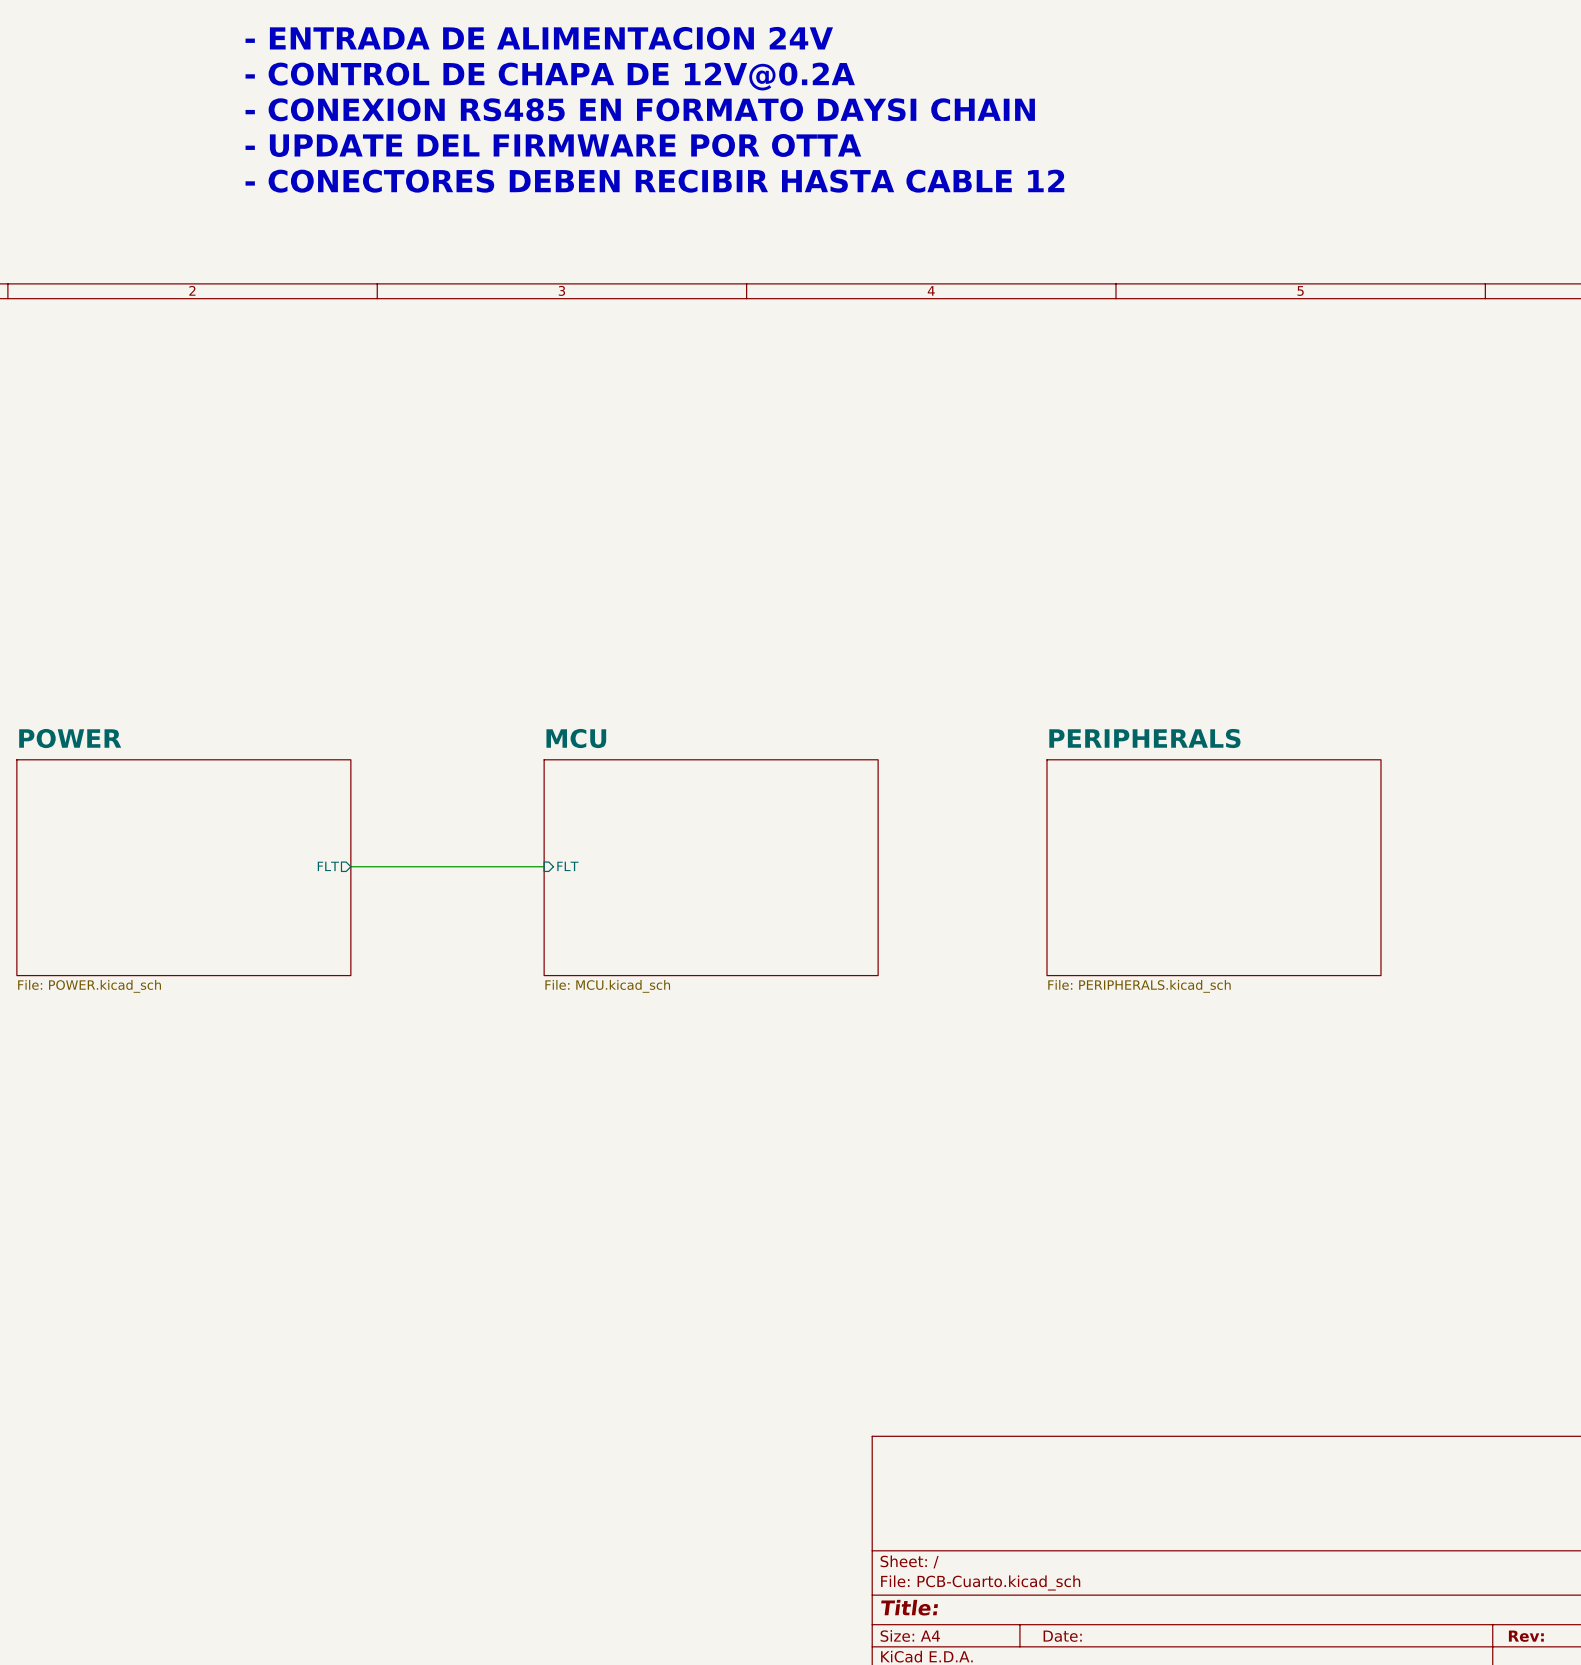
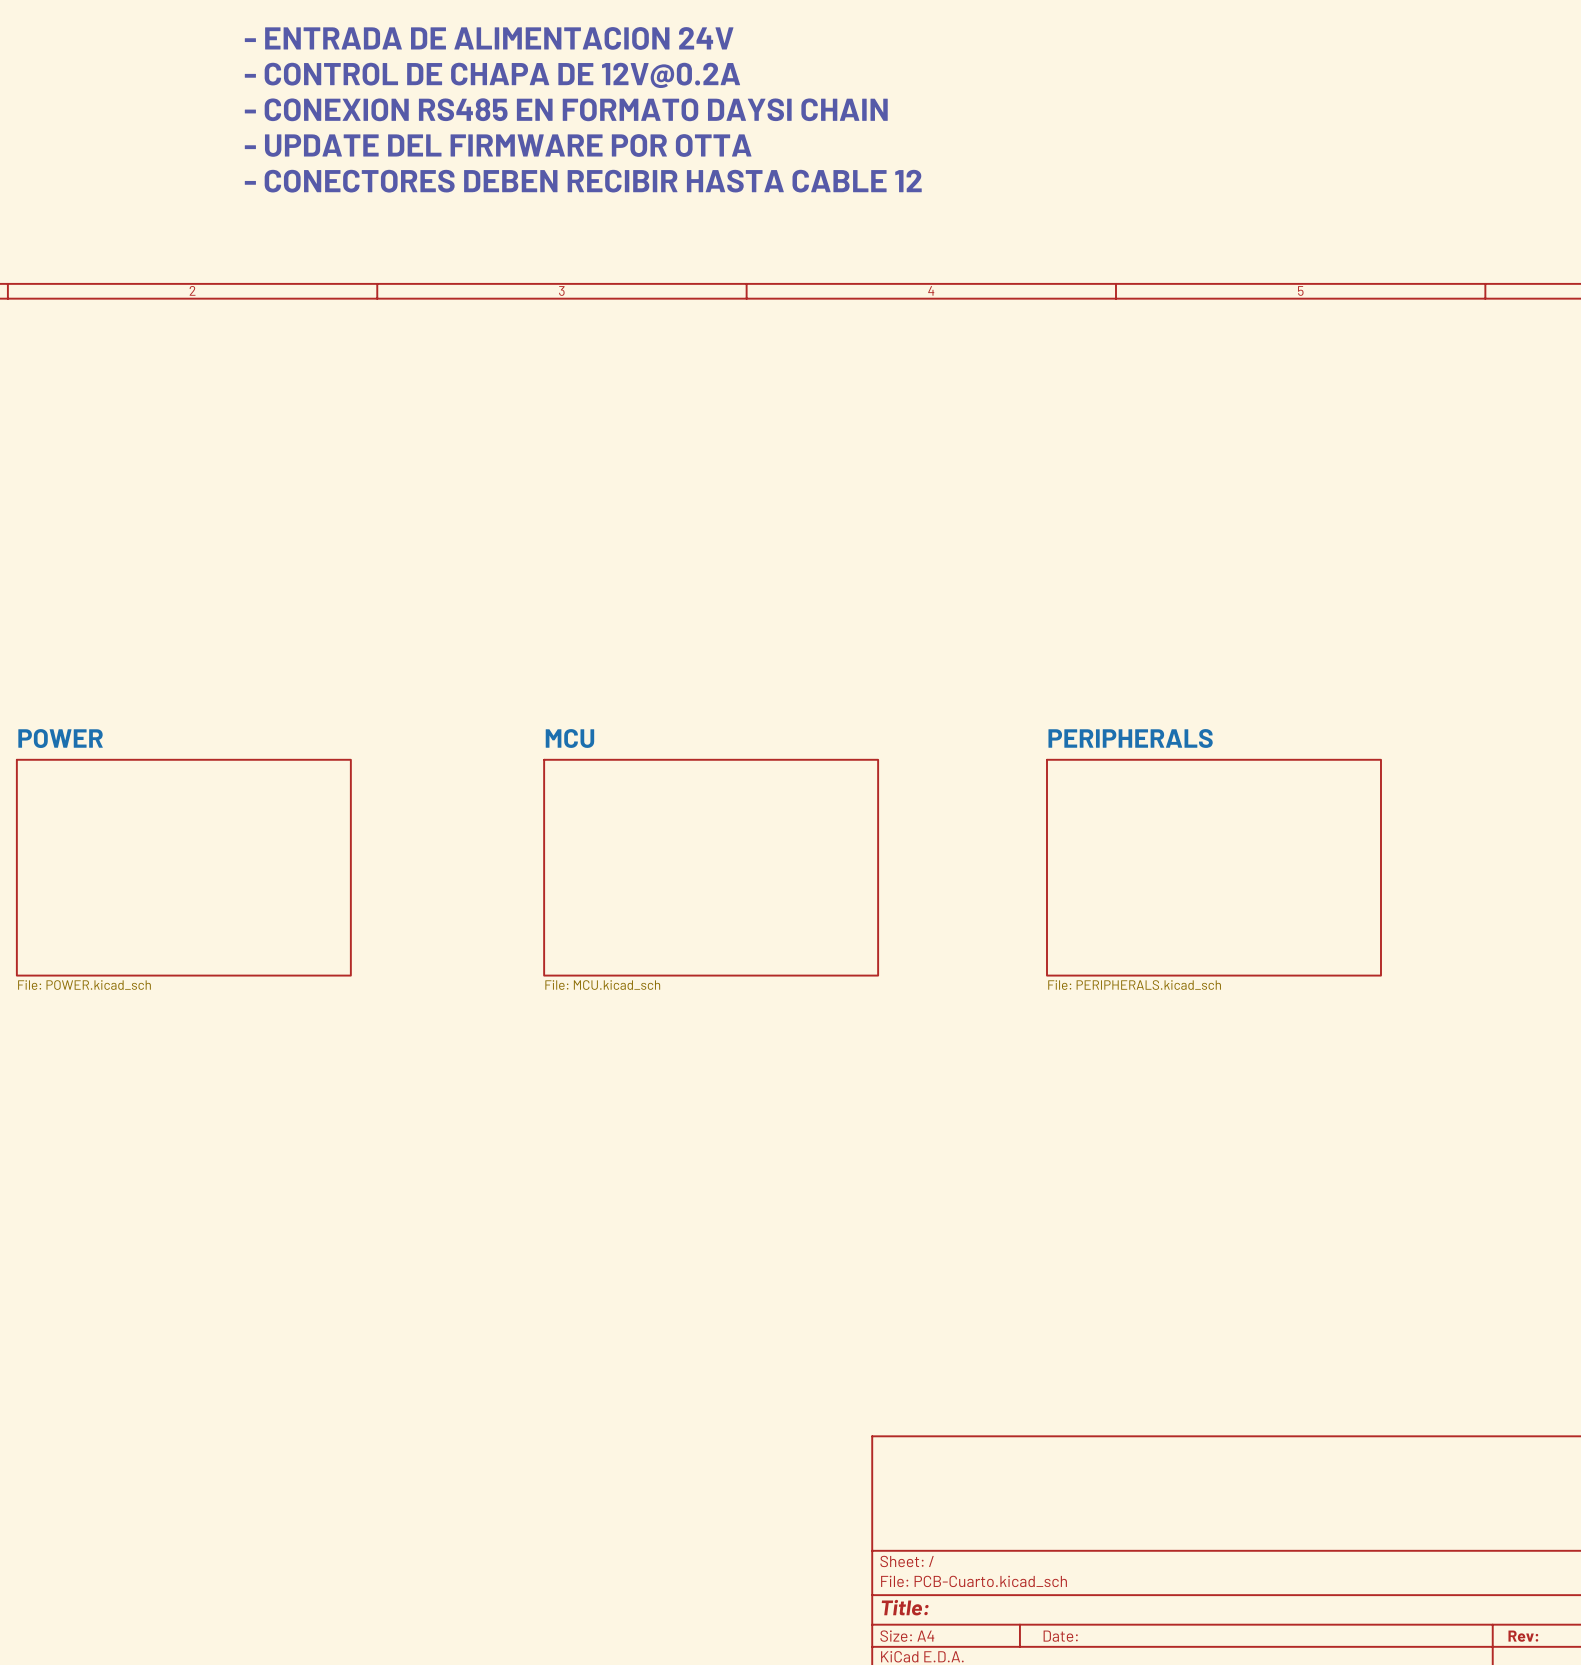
sheet pin: FLT (328, 866) -> none
wire: (350, 866) (544, 866) -> none
sheet pin: FLT (567, 866) -> none

